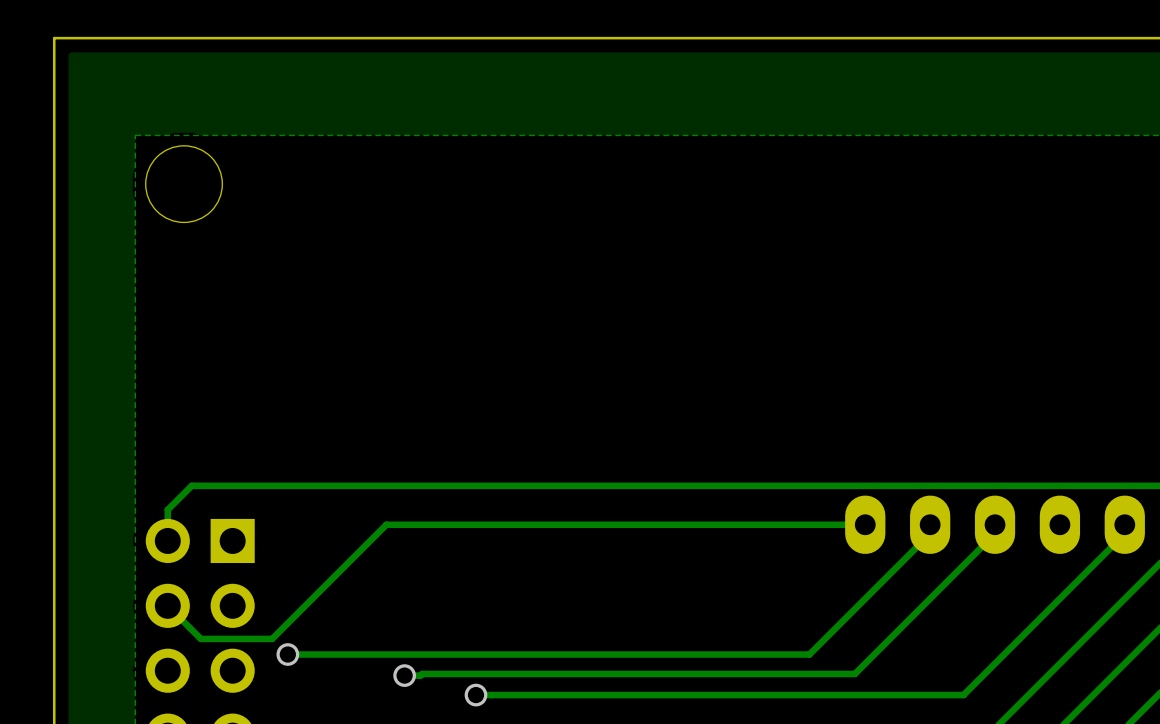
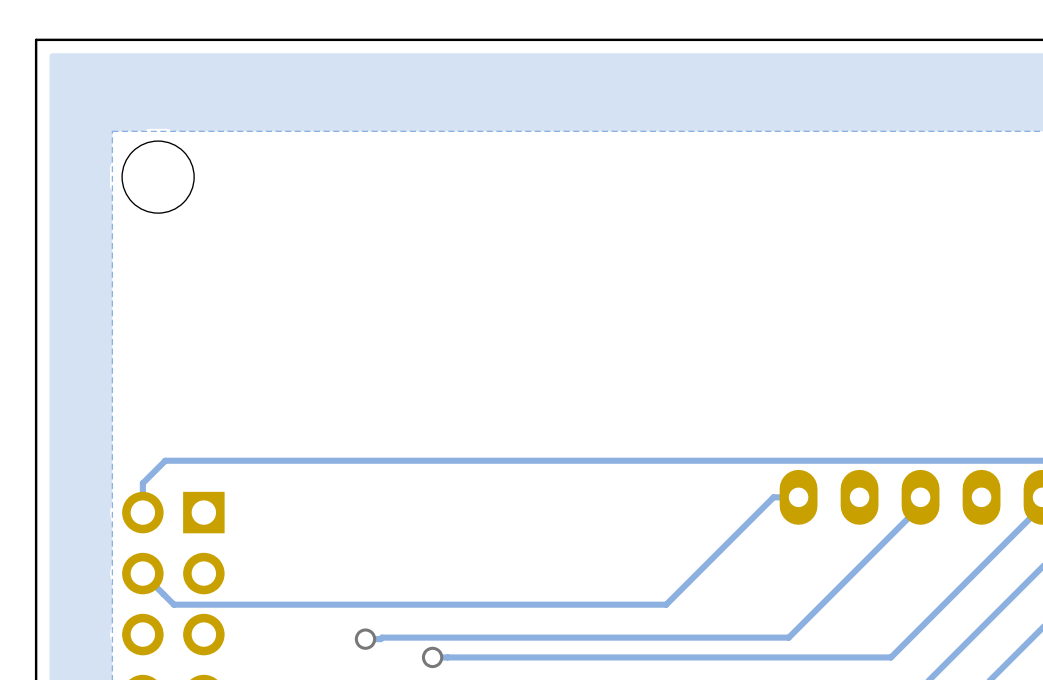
track: (838, 524) (386, 524) (272, 638) -> (773, 497) (666, 604) (241, 604)
track: (930, 524) (930, 533) (809, 654) (287, 654) -> none
via: (287, 654) -> none

